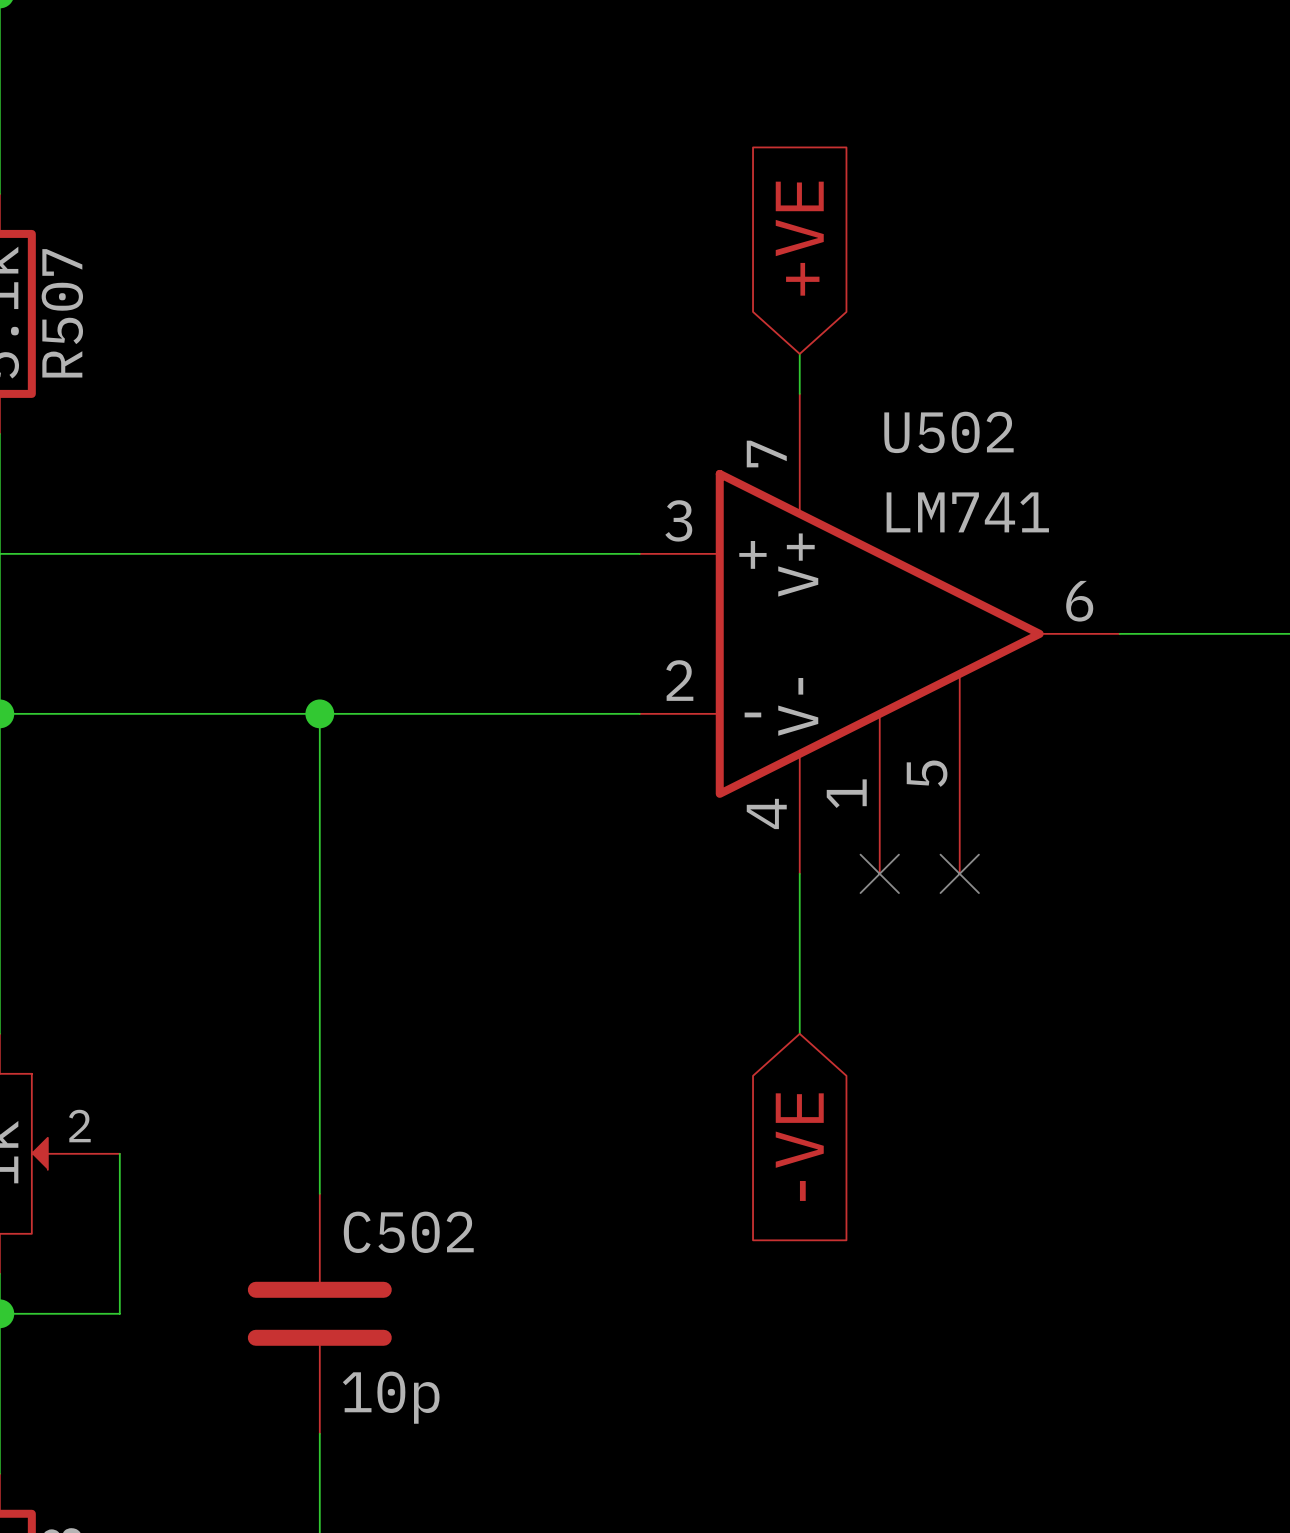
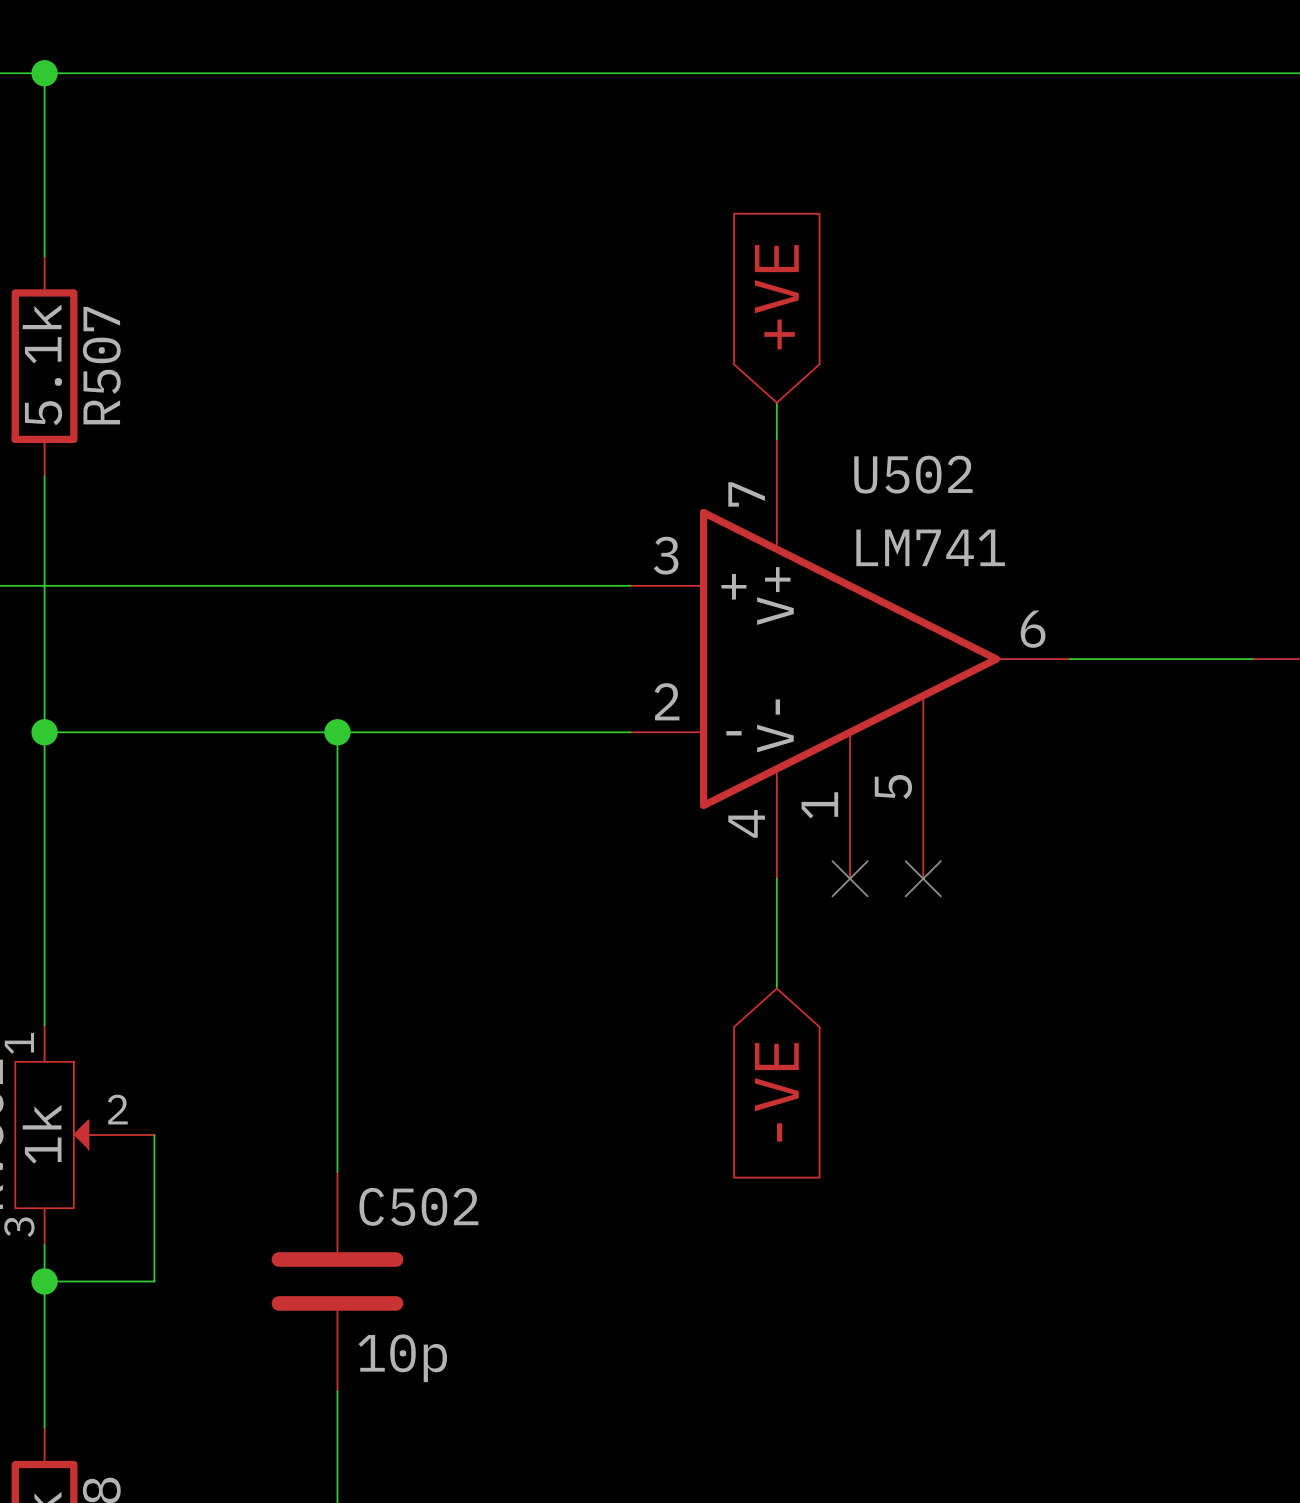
wire: (799, 993) (799, 1033) -> none
global label position: -VE (799, 1147) -> -VE (776, 1092)

